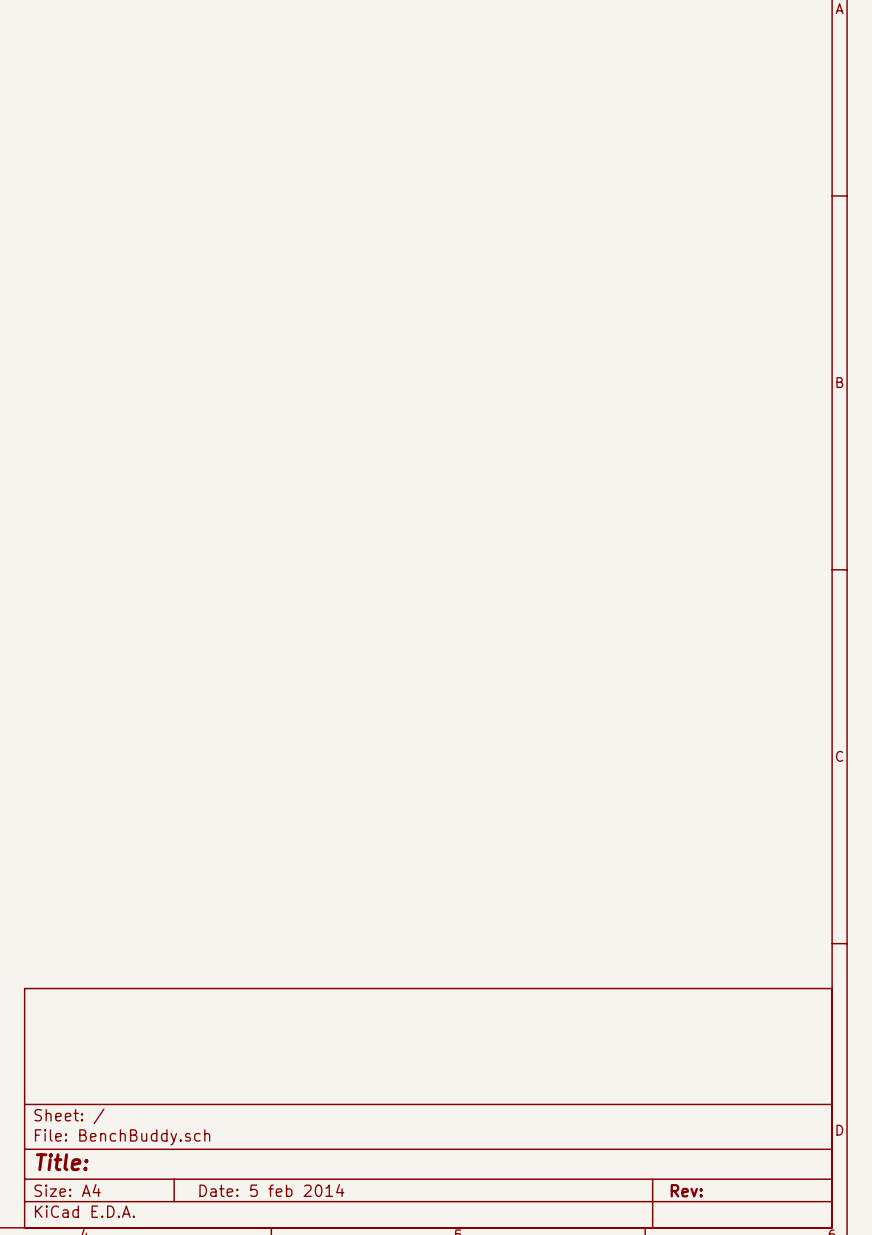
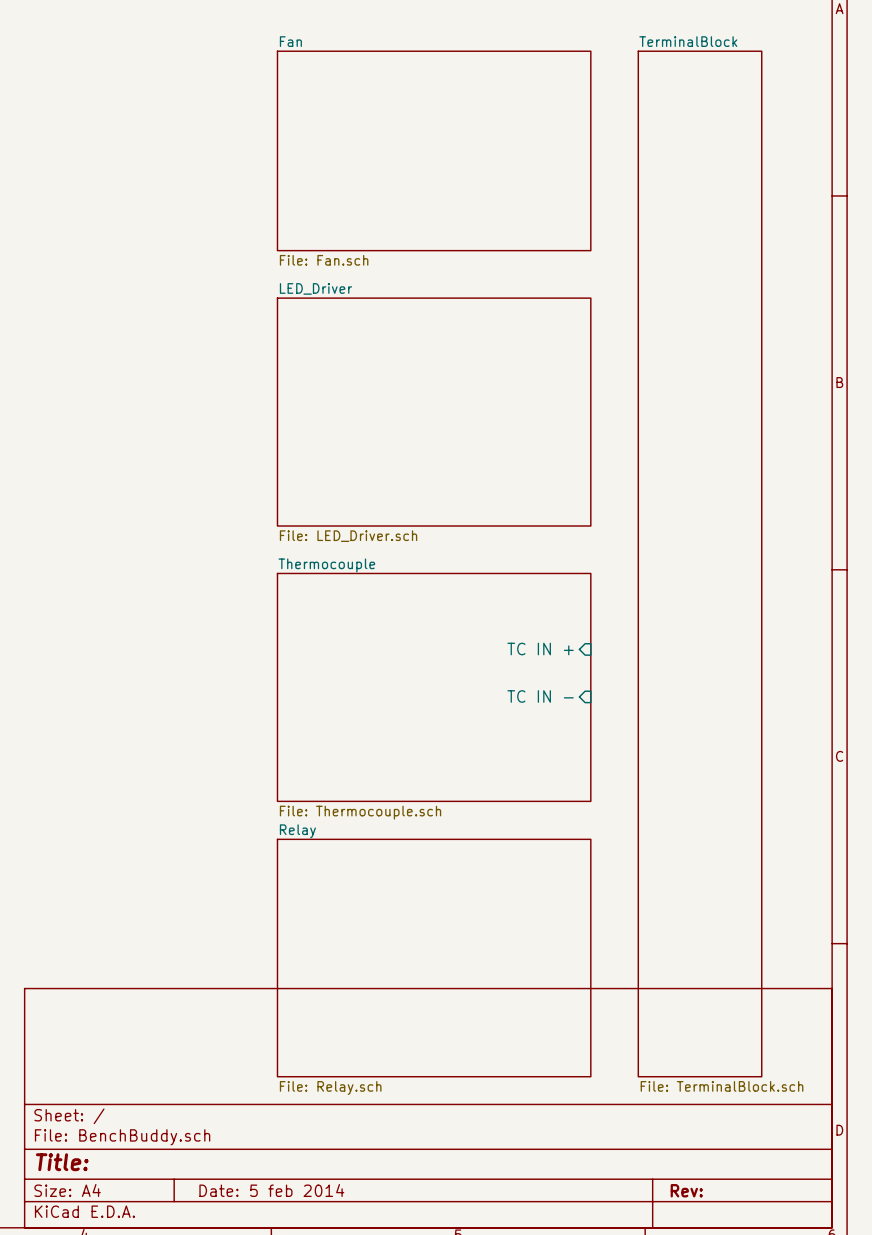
sheet Fan: none -> File: Fan.sch (434, 150)
sheet LED_Driver: none -> File: LED_Driver.sch (434, 412)
sheet TerminalBlock: none -> File: TerminalBlock.sch (700, 563)
sheet pin: none -> TC IN + (540, 649)
sheet Thermocouple: none -> File: Thermocouple.sch (434, 687)
sheet pin: none -> TC IN - (540, 696)
sheet Relay: none -> File: Relay.sch (434, 958)

